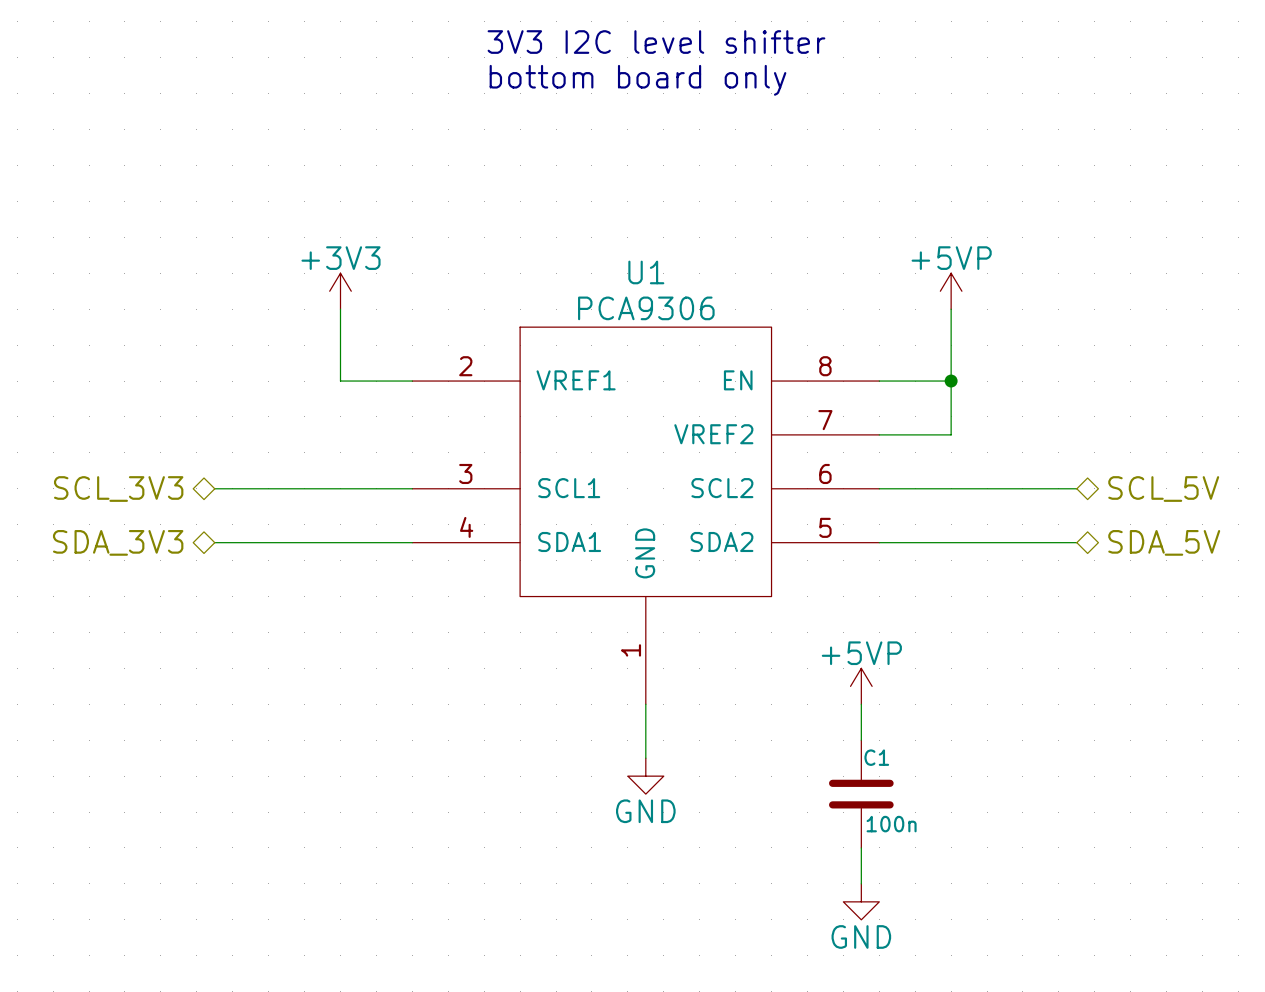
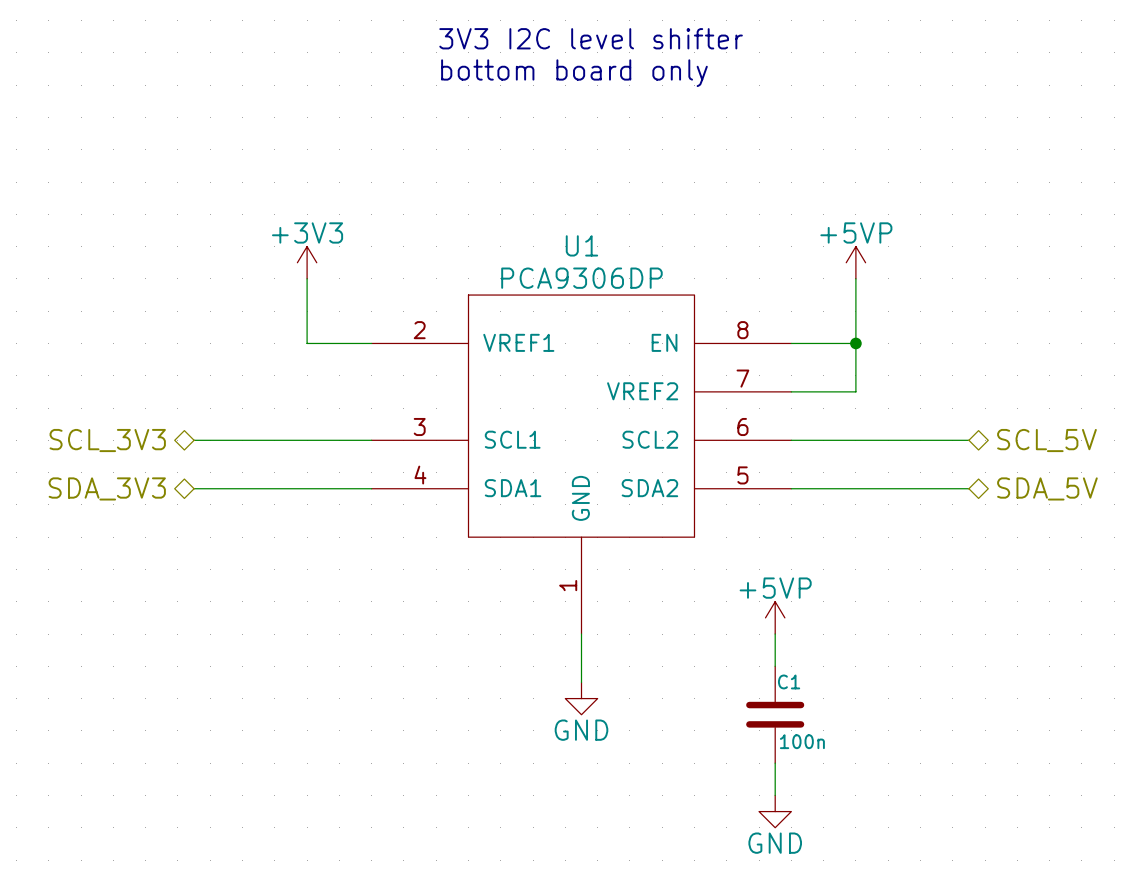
U1 value: PCA9306 (646, 308) -> PCA9306DP (581, 278)

